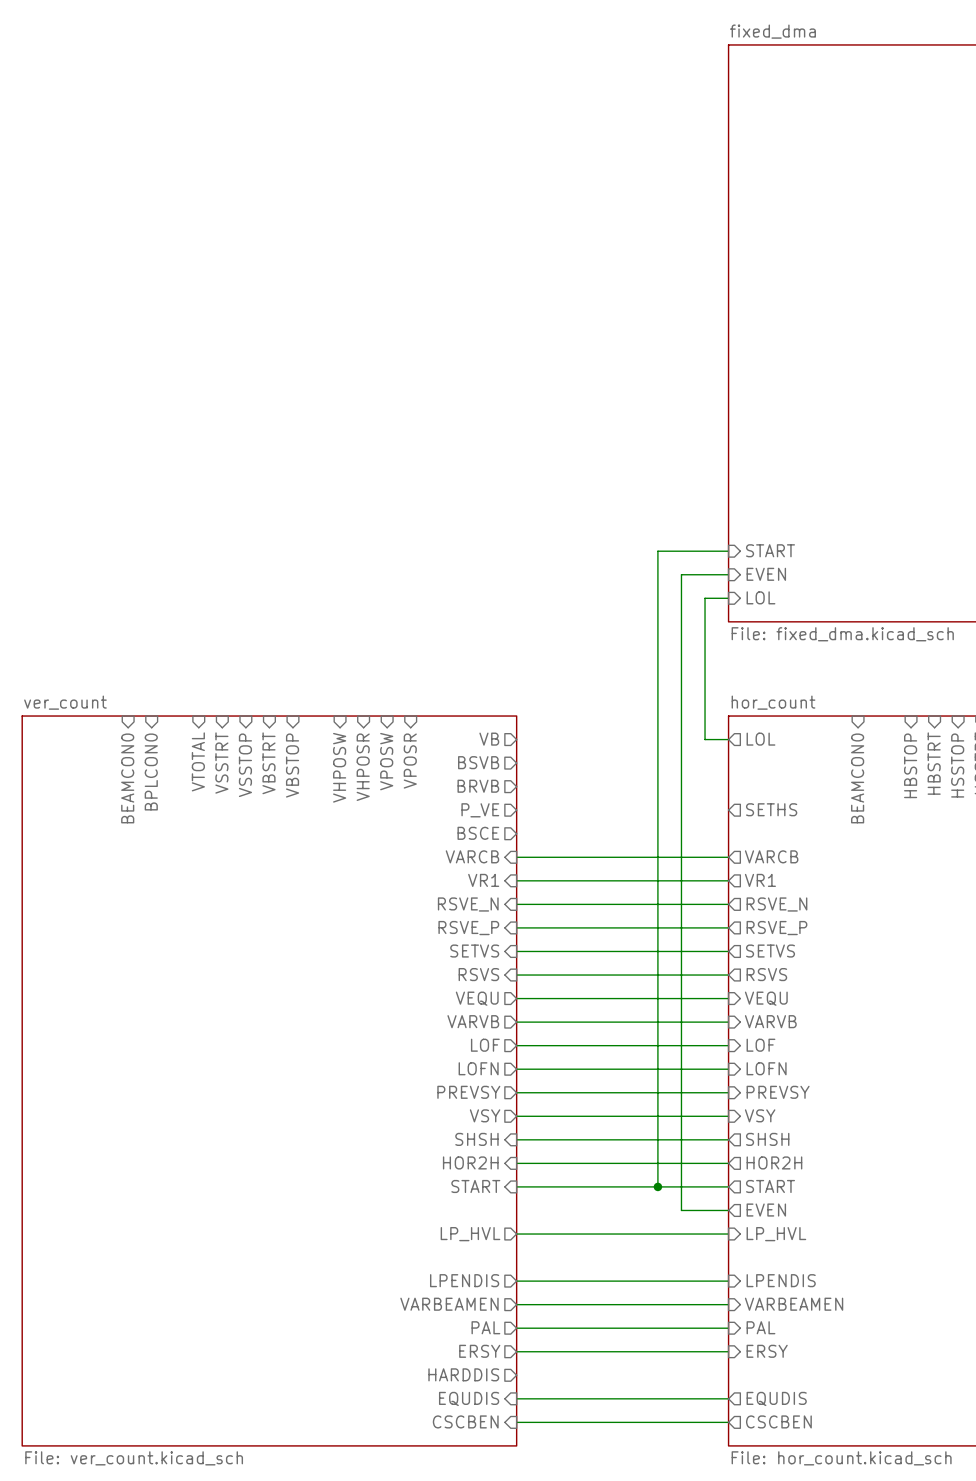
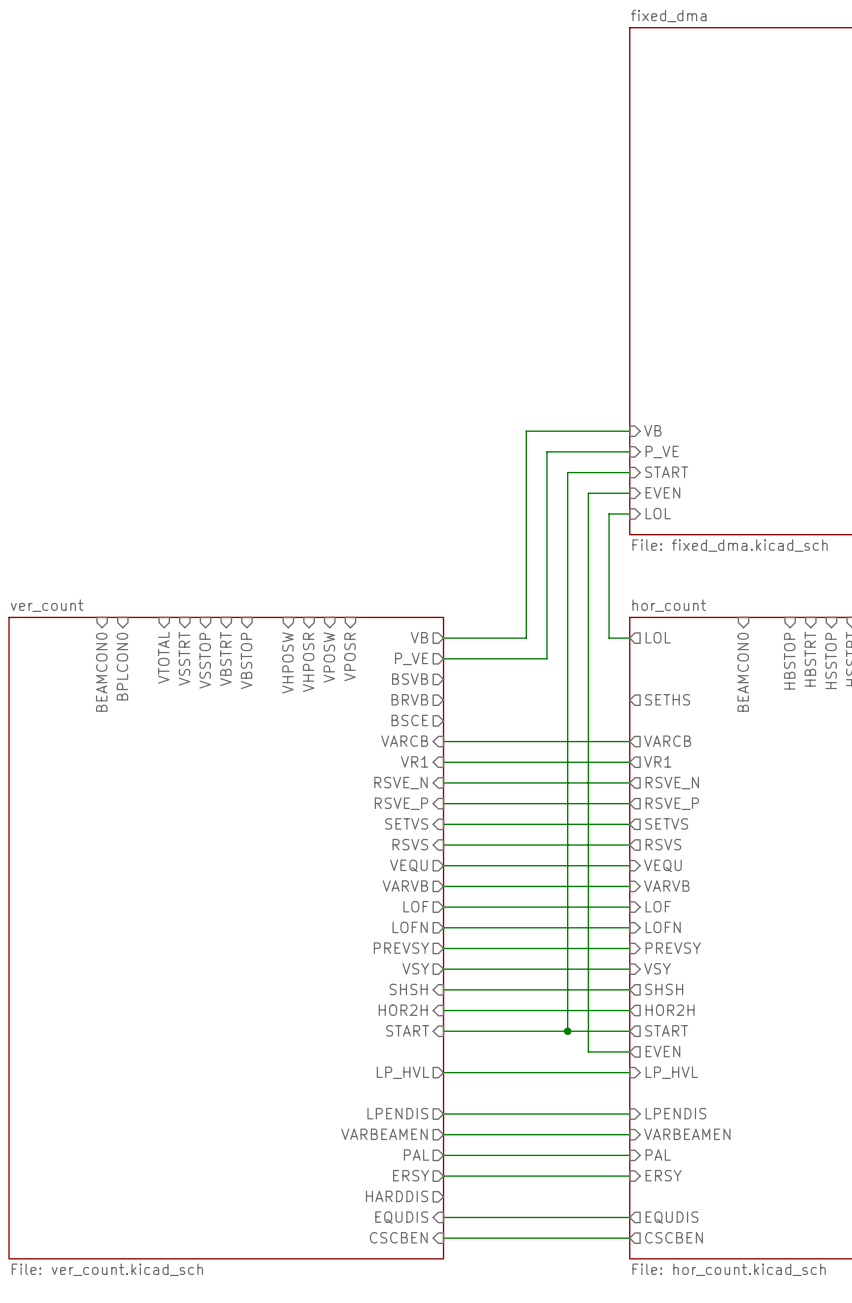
sheet pin: none -> VB (652, 430)
wire: none -> (629, 431) (526, 431) (526, 638) (443, 638)
wire: none -> (629, 451) (546, 451) (546, 658) (443, 658)
sheet pin: none -> P_VE (662, 452)
sheet pin: BSVB (478, 762) -> P_VE (411, 658)
sheet pin: BRVB (478, 786) -> BSVB (410, 679)
sheet pin: P_VE (480, 810) -> BRVB (409, 699)

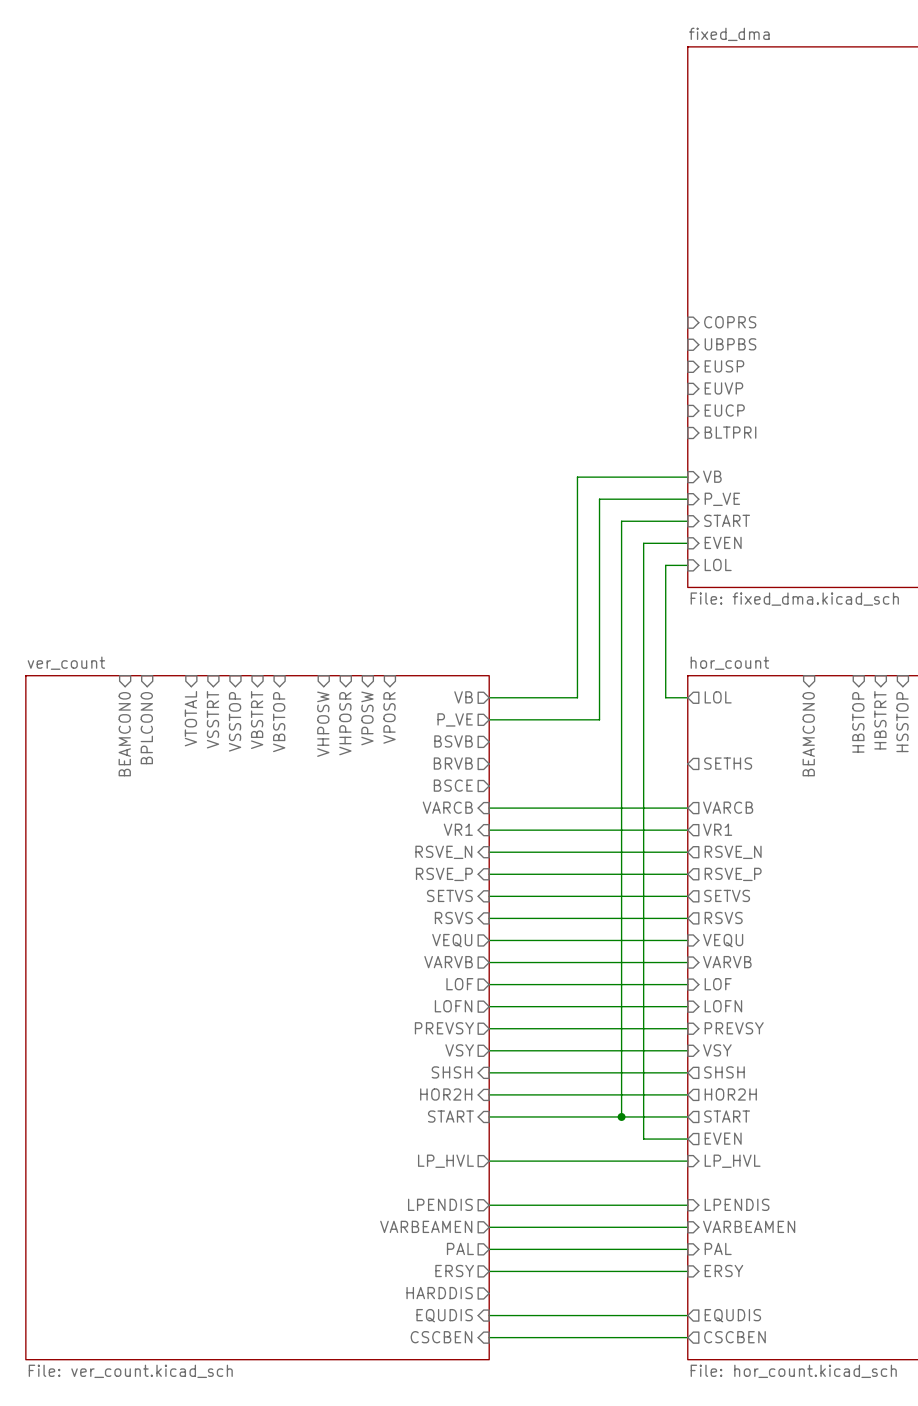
sheet pin: none -> COPRS (730, 322)
sheet pin: none -> UBPBS (730, 344)
sheet pin: none -> EUSP (724, 366)
sheet pin: none -> EUVP (723, 388)
sheet pin: none -> EUCP (724, 410)
sheet pin: none -> BLTPRI (730, 432)

